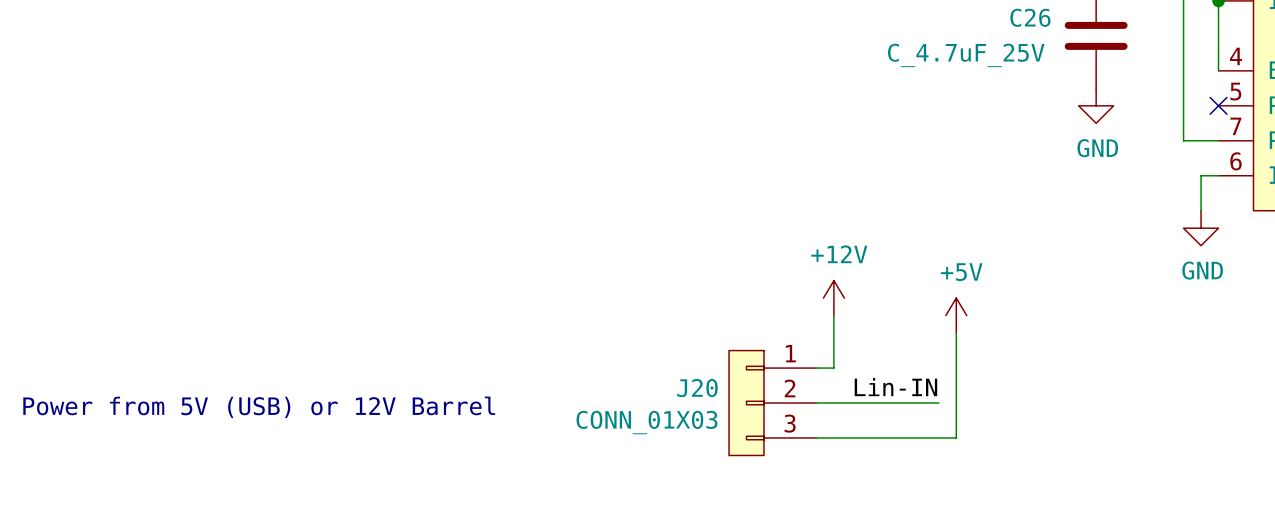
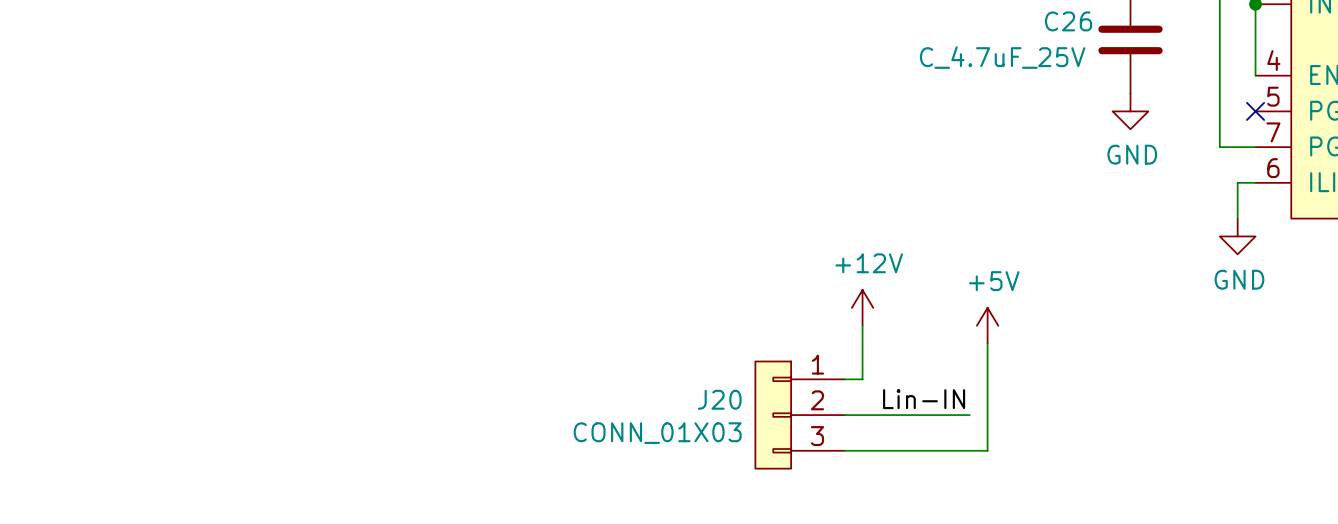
text: Power from 5V (USB) or 12V Barrel (259, 407) -> none

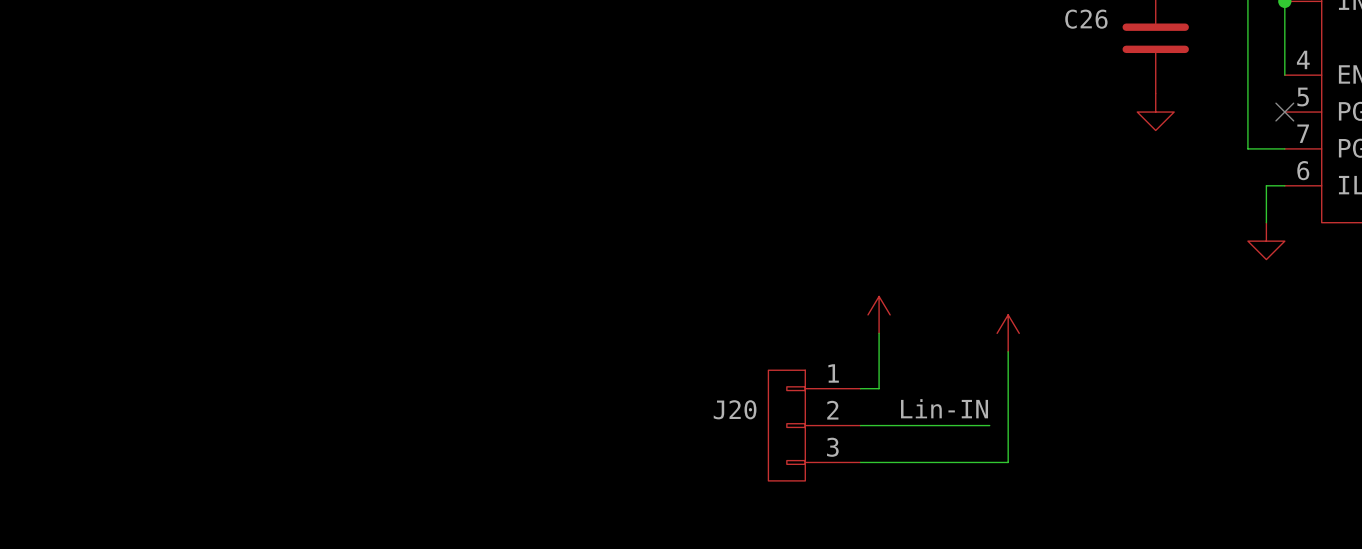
C26 value: C_4.7uF_25V (1002, 57) -> none
power symbol text: GND (1132, 154) -> none
power symbol text: +12V (869, 263) -> none
power symbol text: GND (1239, 279) -> none
power symbol text: +5V (994, 281) -> none
J20 value: CONN_01X03 (657, 433) -> none

